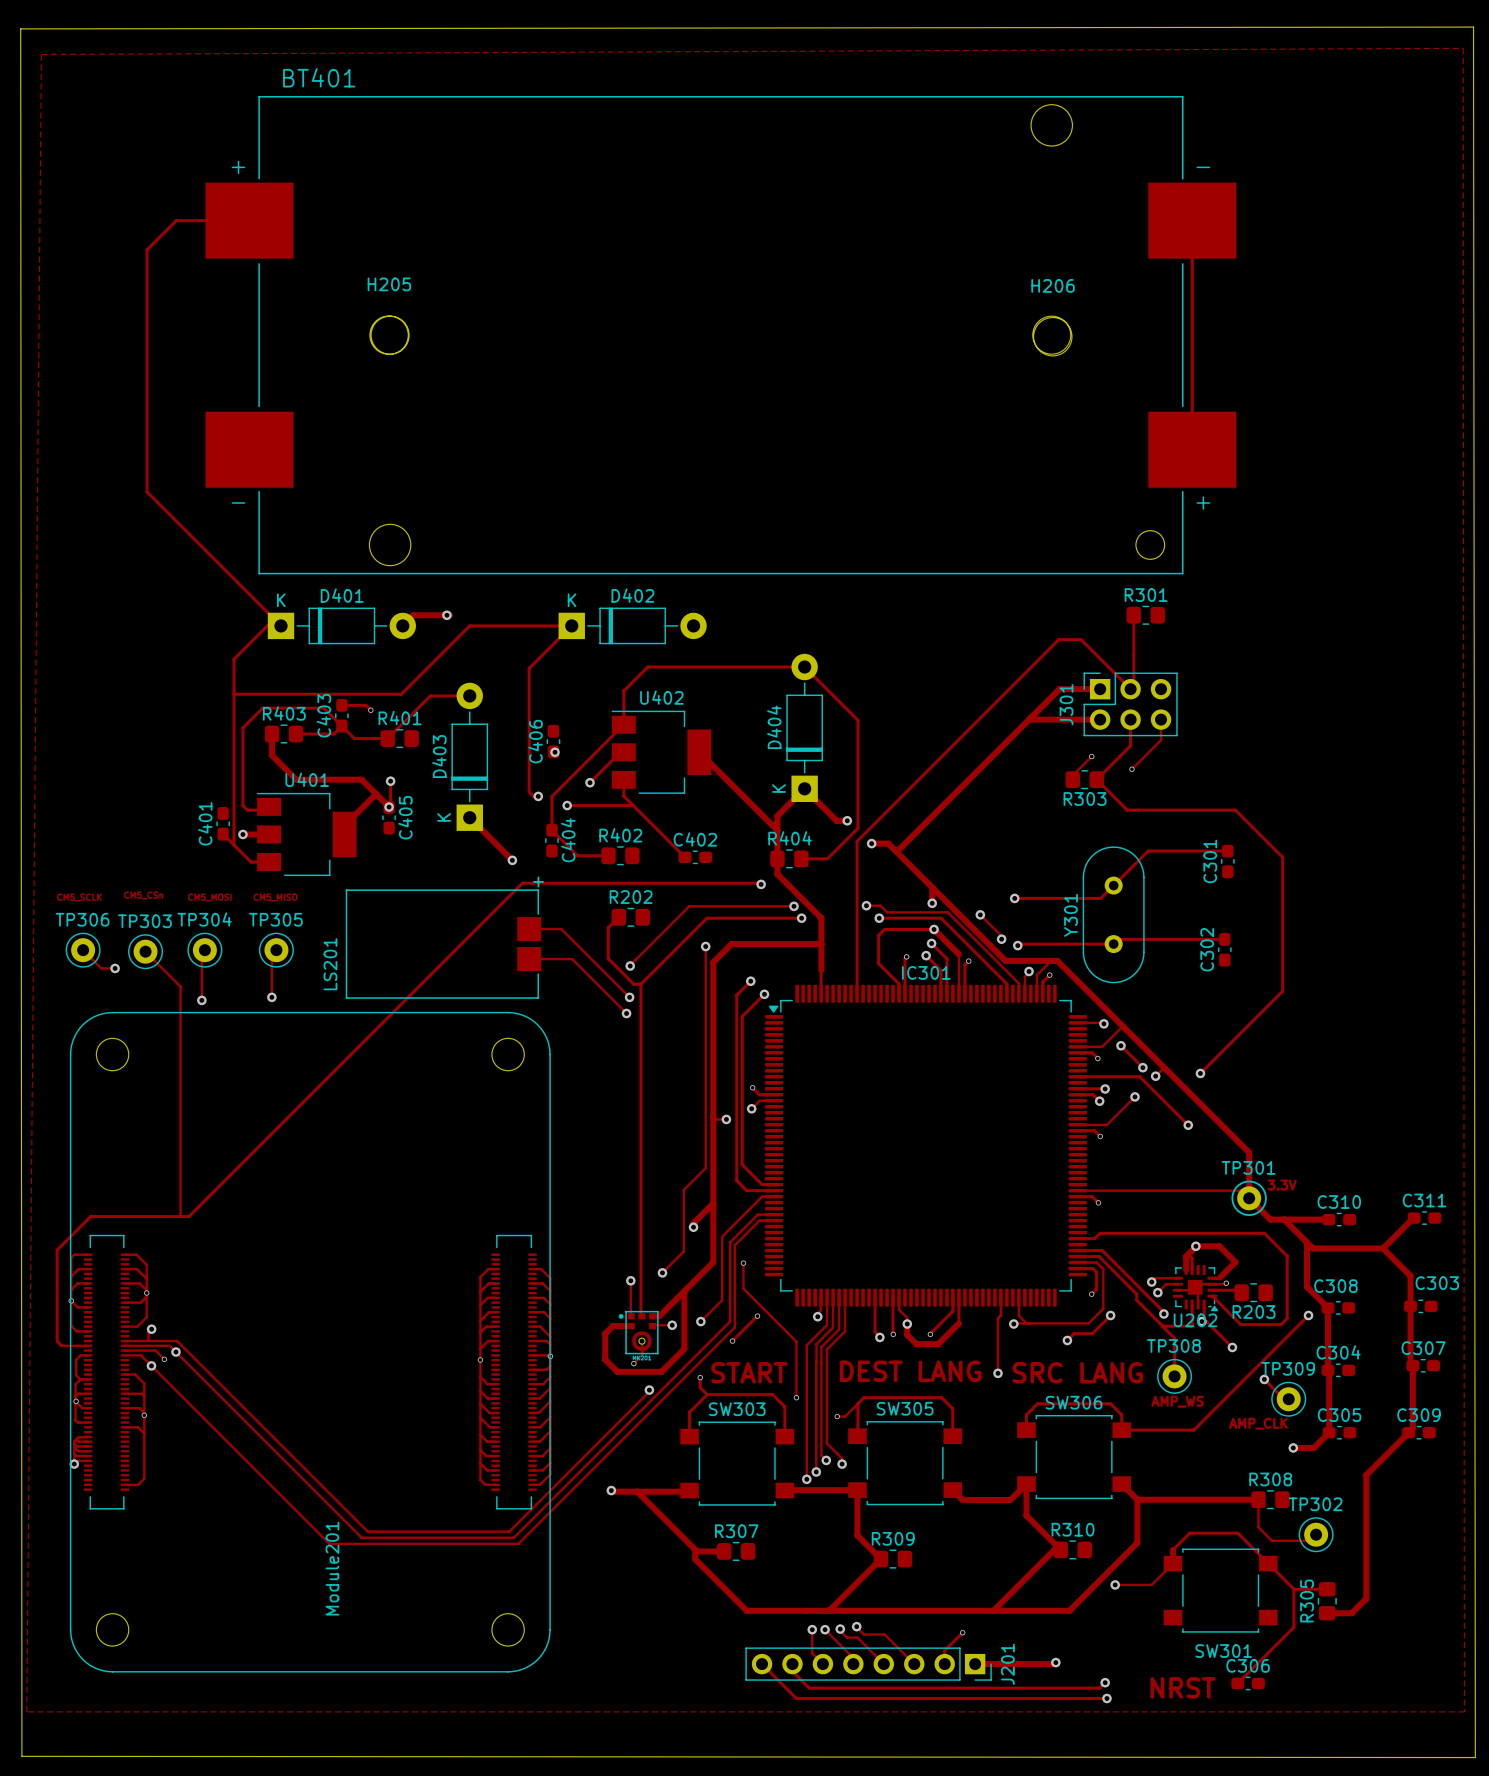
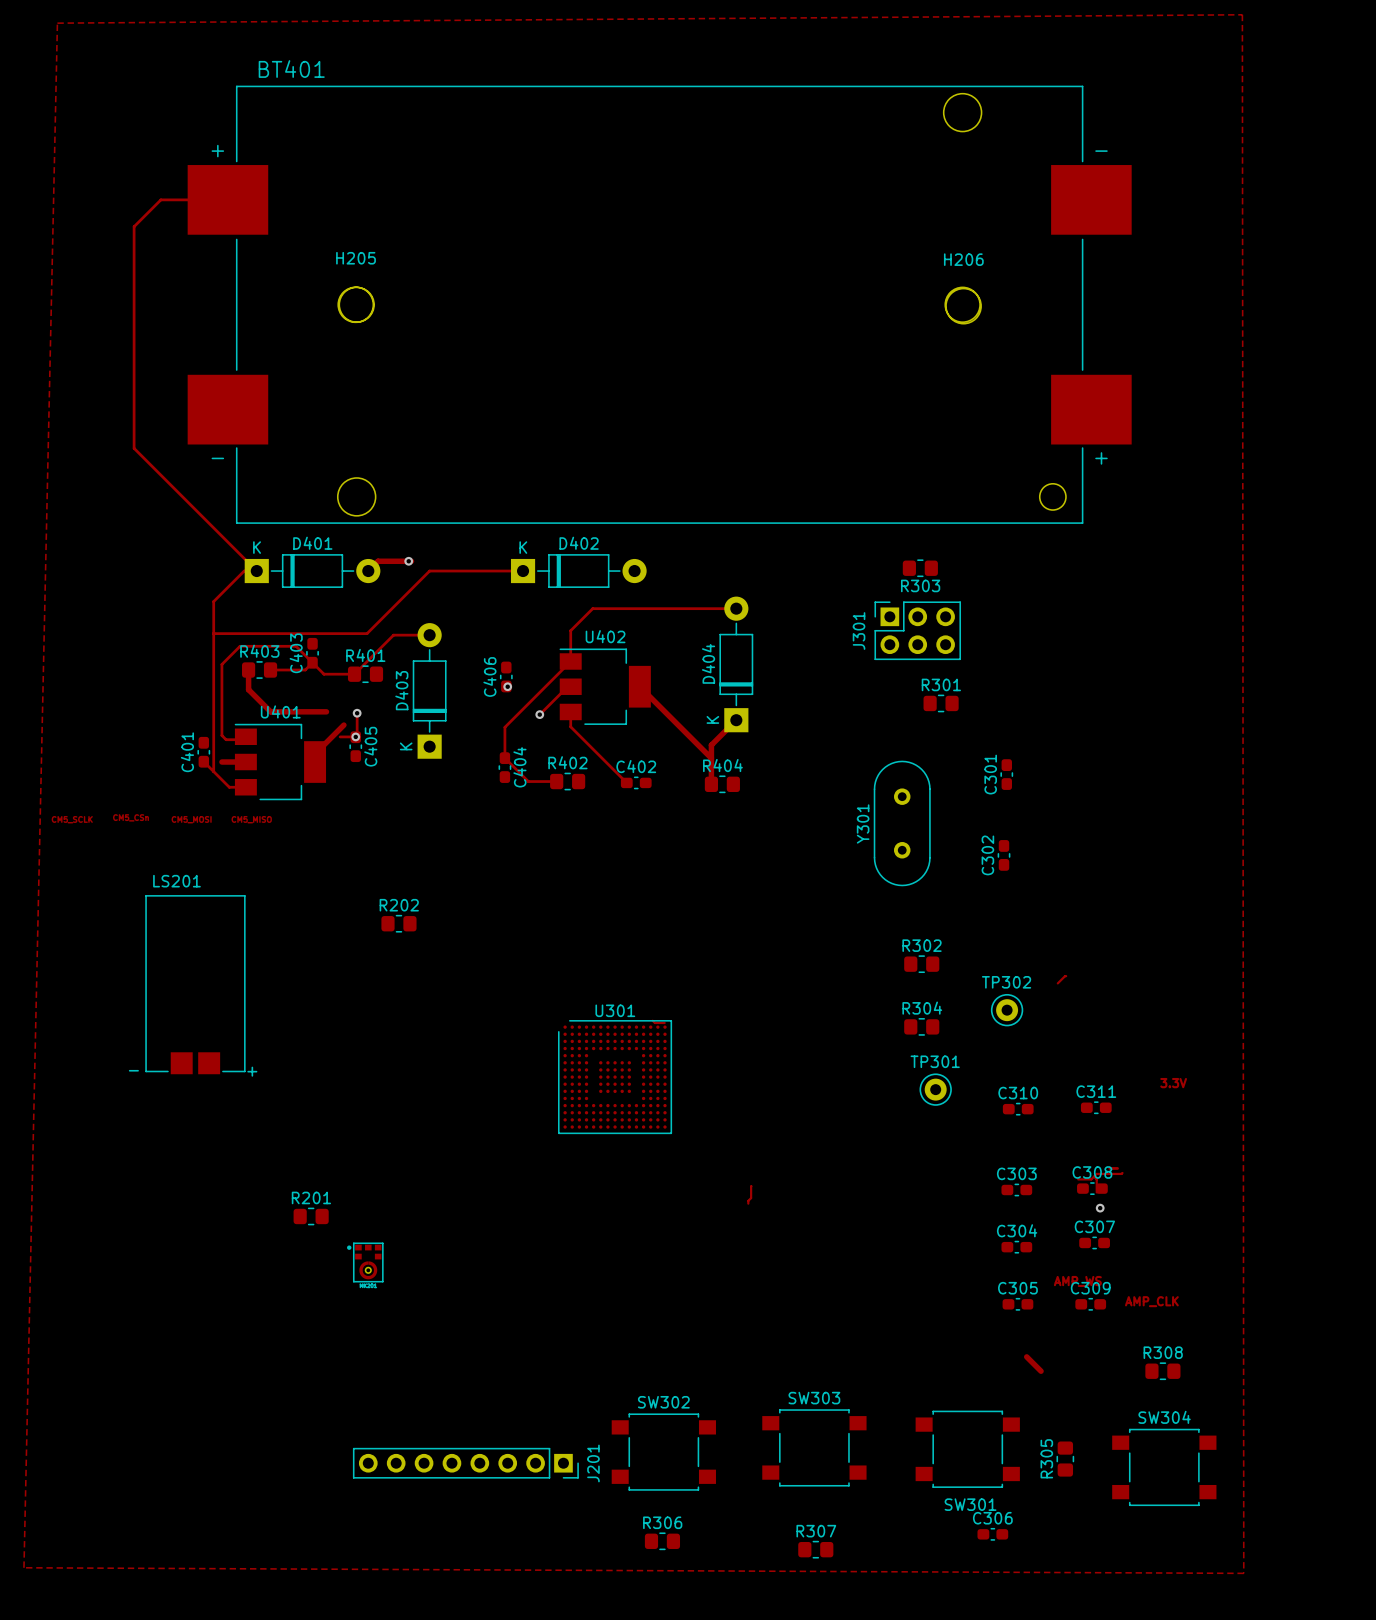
board edge: (1473, 27) (1475, 1757) (21, 1756) (20, 28) (1473, 27) -> none
zone outline: (1463, 48) (41, 54) (26, 1711) (1464, 1711) (1463, 48) -> (1242, 14) (57, 23) (23, 1567) (1243, 1573) (1242, 14)
track: (1192, 220) (1192, 449) -> none
track: (1133, 615) (1133, 685) (1130, 689) (1081, 639) (1058, 639) (857, 841) (857, 993) -> none
R301 position: (1145, 615) -> (941, 703)
track: (571, 625) (529, 668) (529, 791) (533, 796) (538, 796) -> none
track: (804, 667) (857, 720) (857, 828) (827, 858) (801, 858) -> none
track: (1100, 689) (1059, 689) (899, 849) (894, 849) -> none
J301 position: (1130, 704) -> (917, 630)
track: (341, 705) (365, 705) (370, 710) -> none
via: (370, 710) -> none
track: (1029, 719) (1100, 719) -> none
track: (1130, 719) (1130, 745) (1096, 779) (1127, 810) (1235, 810) (1282, 857) (1282, 991) (1200, 1073) -> none
track: (1161, 719) (1161, 740) (1131, 769) -> none
track: (1091, 756) (1072, 775) (1072, 779) -> none
via: (1091, 756) -> none
via: (1131, 769) -> none
track: (357, 779) (361, 779) (389, 807) -> (340, 736) (355, 736)
R303 position: (1084, 779) -> (920, 568)
track: (804, 788) (836, 820) (847, 820) -> none
via: (538, 796) -> none
via: (567, 805) -> none
track: (632, 805) (567, 805) -> none
track: (469, 817) (512, 860) -> none
via: (847, 820) -> none
via: (242, 834) -> none
track: (871, 843) (888, 843) (1005, 960) (1057, 960) (1249, 1152) (1249, 1198) -> none
via: (871, 843) -> none
track: (1227, 851) (1148, 851) (1100, 898) (1014, 898) -> none
track: (777, 858) (777, 874) (821, 918) (821, 993) -> none
via: (512, 860) -> none
C301 position: (1227, 861) -> (1006, 774)
track: (761, 884) (522, 883) (189, 1216) (90, 1216) (57, 1250) (57, 1341) (61, 1345) (88, 1345) -> none
via: (761, 884) -> none
track: (933, 888) (932, 903) -> none
LS201 footprint: [345, 889, 542, 999] -> [145, 895, 246, 1075]
via: (1014, 898) -> none
via: (932, 903) -> none
track: (866, 905) (880, 905) (887, 912) (947, 912) (1018, 983) (1018, 993) -> none
via: (866, 905) -> none
track: (794, 906) (689, 906) (630, 965) -> none
via: (794, 906) -> none
track: (980, 914) (1001, 936) (1001, 939) -> none
via: (980, 914) -> none
Y301 position: (1113, 914) -> (902, 823)
track: (618, 917) (608, 927) (608, 958) (633, 984) (640, 984) -> none
R202 position: (630, 917) -> (398, 923)
track: (801, 918) (706, 918) (640, 984) -> none
via: (801, 918) -> none
track: (879, 918) (941, 918) (1006, 984) (1006, 993) -> none
via: (879, 918) -> none
track: (529, 929) (561, 929) (629, 997) -> none
via: (934, 929) -> none
via: (1001, 939) -> none
track: (1224, 939) (1118, 939) (1113, 944) (1017, 945) -> none
track: (931, 943) (946, 958) (946, 993) -> none
via: (931, 943) -> none
track: (821, 944) (731, 944) (713, 962) (713, 1262) (659, 1316) (651, 1316) -> none
via: (1017, 945) -> none
track: (705, 946) (705, 1168) (683, 1190) (683, 1251) (662, 1272) -> none
via: (705, 946) -> none
C302 position: (1224, 949) -> (1004, 855)
track: (83, 950) (101, 968) (115, 968) -> none
TP306: (83, 950) -> none
track: (204, 950) (201, 953) (201, 1000) -> none
TP304: (204, 950) -> none
track: (276, 950) (271, 954) (271, 997) -> none
TP305: (276, 950) -> none
track: (145, 951) (180, 986) (180, 1216) -> none
TP303: (145, 951) -> none
track: (926, 955) (940, 970) (940, 993) -> none
via: (926, 955) -> none
track: (906, 956) (905, 958) (905, 993) -> none
via: (906, 956) -> none
track: (529, 959) (572, 959) (626, 1013) -> none
track: (1051, 960) (1036, 975) (1036, 993) -> none
track: (968, 961) (964, 964) (964, 993) -> none
via: (968, 961) -> none
LS201 name position: LS201 (330, 964) -> LS201 (176, 881)
via: (630, 965) -> none
via: (115, 968) -> none
track: (1029, 971) (1024, 976) (1024, 993) -> none
via: (1029, 971) -> none
track: (1049, 975) (1042, 982) (1042, 993) -> none
via: (1049, 975) -> none
track: (750, 981) (736, 995) (736, 1180) (746, 1190) (774, 1190) -> none
via: (750, 981) -> none
track: (640, 984) (640, 1316) -> none
track: (899, 993) (899, 983) (878, 963) (878, 935) (884, 929) (934, 929) (958, 954) (958, 993) -> none
track: (764, 994) (742, 1016) (742, 1164) (762, 1184) (774, 1184) -> none
via: (764, 994) -> none
via: (271, 997) -> none
via: (629, 997) -> none
via: (201, 1000) -> none
via: (626, 1013) -> none
track: (1077, 1022) (1102, 1022) -> none
via: (1103, 1023) -> none
track: (1122, 1026) (1102, 1046) (1077, 1046) -> none
track: (1120, 1045) (1142, 1067) -> none
via: (1120, 1045) -> none
track: (1077, 1052) (1092, 1052) (1097, 1058) -> none
R302: none -> (921, 964)
via: (1097, 1058) -> none
via: (1142, 1067) -> none
via: (1200, 1073) -> none
track: (1077, 1076) (1139, 1076) (1188, 1125) -> none
via: (1155, 1076) -> none
track: (752, 1087) (759, 1094) (774, 1094) -> none
via: (752, 1087) -> none
track: (1077, 1088) (1105, 1088) -> none
via: (1105, 1088) -> none
track: (1077, 1094) (1093, 1094) (1099, 1101) -> none
track: (1134, 1096) (1106, 1124) (1078, 1124) -> none
via: (1134, 1096) -> none
track: (774, 1100) (759, 1100) (751, 1108) -> none
via: (1099, 1101) -> none
via: (751, 1108) -> none
via: (726, 1119) -> none
R304: none -> (921, 1026)
via: (1188, 1125) -> none
track: (1077, 1130) (1094, 1130) (1099, 1135) -> none
via: (1100, 1136) -> none
IC301: (925, 1145) -> none
U301: none -> (615, 1077)
track: (1077, 1190) (1241, 1190) (1249, 1198) -> none
track: (774, 1196) (762, 1196) (722, 1236) (722, 1300) (700, 1321) -> none
track: (1077, 1196) (1092, 1196) (1097, 1202) -> none
track: (1249, 1198) (1270, 1219) (1328, 1219) -> none
TP301 position: (1249, 1198) -> (935, 1089)
via: (1098, 1202) -> none
track: (713, 1203) (693, 1223) (693, 1227) -> none
track: (774, 1214) (757, 1214) (730, 1242) (730, 1321) (513, 1537) (361, 1537) (169, 1345) (125, 1345) -> none
track: (1414, 1218) (1383, 1248) -> none
C311 position: (1424, 1218) -> (1096, 1107)
track: (1284, 1219) (1313, 1248) (1383, 1248) -> none
C310 position: (1339, 1219) -> (1018, 1109)
track: (774, 1220) (759, 1220) (734, 1245) (734, 1327) (518, 1543) (329, 1543) (140, 1355) (125, 1355) -> none
via: (693, 1227) -> none
track: (1077, 1238) (1094, 1238) (1099, 1233) (1264, 1233) (1287, 1256) (1287, 1318) (1281, 1324) (1240, 1324) (1212, 1295) -> none
track: (1307, 1242) (1307, 1286) (1329, 1309) -> none
via: (1195, 1246) -> none
track: (1383, 1248) (1410, 1275) (1412, 1428) (1366, 1475) (1366, 1598) (1351, 1613) (1327, 1613) -> none
track: (1077, 1250) (1102, 1250) (1163, 1313) -> none
track: (88, 1254) (74, 1254) (71, 1257) (71, 1325) (76, 1331) (88, 1331) -> none
track: (125, 1254) (136, 1254) (146, 1264) (146, 1317) (137, 1326) (125, 1326) -> none
track: (1188, 1254) (1192, 1258) (1192, 1270) -> none
track: (1077, 1256) (1099, 1256) (1136, 1294) (1136, 1300) (1162, 1326) -> none
track: (1077, 1262) (1096, 1262) (1103, 1269) (1103, 1308) (1088, 1323) (1013, 1324) -> none
track: (743, 1263) (743, 1288) (796, 1341) (796, 1397) -> none
via: (743, 1263) -> none
track: (1077, 1268) (1092, 1268) (1096, 1272) (1096, 1289) (1091, 1294) -> none
track: (88, 1269) (78, 1269) (71, 1276) -> none
track: (125, 1269) (136, 1269) (146, 1278) -> none
track: (495, 1269) (488, 1269) (480, 1277) (480, 1479) (485, 1484) (495, 1484) -> none
track: (532, 1269) (541, 1269) (550, 1278) (550, 1474) (540, 1484) (532, 1484) -> none
track: (1186, 1270) (1186, 1256) (1195, 1246) (1219, 1246) (1235, 1262) (1220, 1277) -> none
via: (662, 1272) -> none
track: (1177, 1278) (1155, 1278) (1151, 1282) -> none
track: (630, 1280) (630, 1316) -> none
via: (630, 1280) -> none
via: (1151, 1282) -> none
track: (88, 1283) (77, 1283) (71, 1289) -> none
track: (125, 1283) (139, 1283) (146, 1290) -> none
track: (495, 1283) (488, 1283) (480, 1291) -> none
track: (532, 1283) (542, 1283) (550, 1291) -> none
via: (1226, 1283) -> none
C303 name position: C303 (1437, 1283) -> C303 (1016, 1173)
track: (1177, 1284) (1166, 1284) (1157, 1292) -> none
C308 name position: C308 (1335, 1286) -> C308 (1092, 1172)
U202: (1195, 1288) -> none
track: (1212, 1290) (1239, 1290) (1241, 1292) -> none
track: (684, 1291) (684, 1348) (661, 1371) (617, 1371) (605, 1359) (605, 1333) (612, 1326) (630, 1326) -> none
via: (146, 1292) -> none
via: (1157, 1292) -> none
R203: (1253, 1292) -> none
via: (1091, 1294) -> none
track: (146, 1296) (140, 1302) (125, 1302) -> none
track: (495, 1297) (487, 1297) (480, 1305) -> none
track: (532, 1297) (543, 1297) (550, 1304) -> none
track: (827, 1297) (827, 1325) (806, 1345) (806, 1479) -> none
track: (833, 1297) (833, 1327) (816, 1344) (816, 1362) -> none
track: (839, 1297) (839, 1329) (821, 1347) (821, 1455) (826, 1460) -> none
track: (845, 1297) (845, 1331) (826, 1349) (826, 1443) (842, 1458) (842, 1464) -> none
track: (875, 1297) (875, 1332) (879, 1337) -> none
track: (893, 1297) (892, 1333) -> none
track: (899, 1297) (899, 1309) (907, 1317) (907, 1334) (916, 1344) (938, 1344) (958, 1323) (958, 1297) -> none
track: (952, 1297) (952, 1311) (929, 1334) -> none
track: (1000, 1297) (1000, 1315) -> none
track: (1018, 1297) (1018, 1315) (1026, 1323) -> none
track: (71, 1300) (77, 1307) (88, 1307) -> none
via: (71, 1300) -> none
track: (1192, 1304) (1191, 1326) (1162, 1326) -> none
track: (1204, 1304) (1204, 1319) (1201, 1321) (1206, 1321) (1232, 1347) -> none
C308 position: (1420, 1306) -> (1092, 1188)
track: (1327, 1307) (1329, 1432) (1313, 1447) (1293, 1447) -> none
C303 position: (1338, 1307) -> (1016, 1189)
track: (495, 1312) (489, 1312) (480, 1320) -> none
track: (532, 1312) (544, 1312) (550, 1318) -> none
via: (1163, 1313) -> none
track: (1001, 1315) (997, 1318) (997, 1373) -> none
track: (1110, 1315) (1092, 1333) (1074, 1333) (1067, 1340) -> none
via: (1110, 1315) -> none
track: (1308, 1315) (1193, 1430) (1121, 1430) (1121, 1414) (1110, 1403) (1037, 1403) (1026, 1414) (1026, 1430) -> none
via: (1308, 1315) -> none
track: (757, 1316) (732, 1341) -> none
via: (757, 1316) -> none
via: (817, 1316) -> none
via: (700, 1321) -> none
via: (907, 1324) -> none
via: (1013, 1324) -> none
track: (672, 1325) (651, 1326) -> none
via: (672, 1325) -> none
track: (495, 1326) (486, 1326) (480, 1332) -> none
track: (532, 1326) (540, 1326) (550, 1336) -> none
track: (1162, 1326) (1174, 1338) (1174, 1376) -> none
track: (151, 1329) (148, 1332) (148, 1341) -> none
via: (151, 1329) -> none
R201: none -> (311, 1216)
part position: (638, 1332) -> (365, 1262)
via: (893, 1334) -> none
via: (930, 1334) -> none
via: (879, 1337) -> none
track: (642, 1340) (642, 1355) (633, 1363) -> none
via: (1067, 1340) -> none
track: (125, 1341) (177, 1341) (367, 1531) (509, 1531) (649, 1390) -> none
track: (495, 1341) (488, 1341) (480, 1348) -> none
track: (532, 1341) (546, 1341) (550, 1344) -> none
via: (732, 1341) -> none
Module201: (310, 1342) -> none
via: (1232, 1347) -> none
track: (125, 1350) (155, 1350) (164, 1359) -> none
via: (175, 1352) -> none
track: (88, 1355) (80, 1355) (76, 1359) (76, 1375) (80, 1379) (88, 1379) -> none
track: (532, 1355) (547, 1355) (550, 1358) -> none
via: (550, 1356) -> none
via: (164, 1359) -> none
via: (480, 1359) -> none
track: (816, 1362) (816, 1471) -> none
via: (633, 1363) -> none
via: (151, 1365) -> none
C307 position: (1423, 1365) -> (1094, 1242)
track: (550, 1366) (546, 1369) (532, 1369) -> none
C304 position: (1338, 1370) -> (1016, 1247)
text: DEST LANG (910, 1371) -> none
text: START (749, 1372) -> none
text: SRC LANG (1077, 1372) -> none
via: (997, 1373) -> none
track: (125, 1374) (135, 1374) (144, 1383) (144, 1478) (138, 1484) (125, 1484) -> none
TP308: (1174, 1376) -> none
track: (480, 1377) (487, 1384) (495, 1384) -> none
track: (550, 1377) (543, 1384) (532, 1384) -> none
track: (700, 1377) (700, 1387) (707, 1394) -> none
via: (700, 1377) -> none
track: (80, 1379) (75, 1384) (75, 1420) (77, 1422) (88, 1422) -> none
track: (1264, 1379) (1284, 1399) (1288, 1399) -> none
via: (1264, 1379) -> none
track: (550, 1387) (539, 1398) (532, 1398) -> none
via: (649, 1390) -> none
track: (480, 1391) (487, 1398) (495, 1398) -> none
track: (88, 1393) (78, 1393) (75, 1396) -> none
track: (125, 1393) (141, 1393) (144, 1396) -> none
track: (707, 1394) (772, 1394) (784, 1406) (784, 1436) -> none
track: (707, 1394) (689, 1412) (689, 1436) -> none
via: (796, 1397) -> none
TP309: (1288, 1399) -> none
track: (75, 1401) (82, 1408) (88, 1408) -> none
via: (76, 1401) -> none
track: (550, 1401) (538, 1412) (532, 1412) -> none
track: (859, 1402) (845, 1416) (837, 1416) -> none
track: (480, 1403) (489, 1412) (495, 1412) -> none
track: (125, 1408) (139, 1408) (144, 1412) -> none
via: (144, 1415) -> none
via: (837, 1416) -> none
track: (480, 1417) (489, 1427) (495, 1427) -> none
track: (550, 1417) (540, 1427) (532, 1427) -> none
track: (125, 1427) (137, 1427) (144, 1433) -> none
track: (550, 1431) (539, 1441) (532, 1441) -> none
C305 position: (1339, 1432) -> (1017, 1304)
C309 position: (1419, 1432) -> (1090, 1304)
track: (480, 1434) (487, 1441) (495, 1441) -> none
track: (88, 1436) (78, 1437) (74, 1441) (74, 1464) (77, 1460) (88, 1460) -> none
track: (857, 1436) (857, 1403) (864, 1397) (941, 1397) (952, 1408) (952, 1436) -> none
track: (76, 1439) (78, 1441) (88, 1441) -> none
track: (74, 1443) (77, 1446) (88, 1446) -> none
track: (74, 1447) (78, 1451) (88, 1451) -> none
via: (1293, 1447) -> none
track: (550, 1448) (542, 1456) (532, 1456) -> none
track: (480, 1450) (486, 1456) (495, 1456) -> none
track: (74, 1453) (76, 1456) (88, 1456) -> none
SW306: (1074, 1457) -> none
via: (826, 1460) -> none
track: (550, 1462) (542, 1470) (532, 1470) -> none
track: (480, 1463) (487, 1470) (495, 1470) -> none
SW303 position: (737, 1463) -> (814, 1447)
SW305: (905, 1463) -> none
via: (74, 1464) -> none
via: (842, 1464) -> none
via: (816, 1471) -> none
via: (806, 1479) -> none
track: (611, 1490) (683, 1491) -> none
via: (611, 1490) -> none
track: (784, 1490) (857, 1490) (857, 1535) (880, 1559) (829, 1610) -> none
track: (952, 1490) (962, 1499) (1010, 1499) (1026, 1484) (1026, 1515) (1060, 1549) (1054, 1549) (993, 1610) -> none
track: (637, 1491) (697, 1551) (724, 1551) -> none
track: (1258, 1499) (1258, 1527) (1271, 1540) (1310, 1540) (1316, 1534) -> none
track: (1258, 1499) (1137, 1499) (1137, 1542) (1069, 1610) (746, 1610) (695, 1559) (695, 1549) -> none
TP302 footprint: [1298, 1517, 1334, 1553] -> [990, 993, 1024, 1027]
R310: (1072, 1549) -> none
R307 position: (736, 1551) -> (815, 1549)
R309: (892, 1559) -> none
track: (1115, 1584) (1151, 1584) (1173, 1563) (1173, 1549) (1189, 1533) (1237, 1533) (1293, 1589) -> none
via: (1115, 1584) -> none
SW302: none -> (663, 1452)
track: (1293, 1589) (1293, 1627) (1237, 1683) -> none
track: (1293, 1589) (1327, 1589) -> none
SW301 position: (1220, 1590) -> (967, 1449)
R305 position: (1327, 1601) -> (1065, 1459)
SW304: none -> (1164, 1467)
track: (856, 1626) (864, 1634) (884, 1634) (914, 1664) -> none
via: (856, 1626) -> none
track: (812, 1629) (812, 1653) (822, 1664) -> none
via: (812, 1629) -> none
track: (825, 1629) (853, 1658) (853, 1664) -> none
via: (825, 1629) -> none
track: (840, 1629) (846, 1637) (857, 1637) (883, 1664) -> none
via: (840, 1629) -> none
track: (962, 1632) (944, 1650) (944, 1664) -> none
via: (962, 1632) -> none
track: (1055, 1662) (975, 1664) -> none
via: (1055, 1662) -> none
track: (762, 1664) (796, 1698) (1106, 1698) -> none
track: (792, 1664) (792, 1671) (809, 1688) (1099, 1688) (1105, 1682) -> none
J201 position: (868, 1664) -> (465, 1463)
via: (1105, 1682) -> none
C306 position: (1248, 1683) -> (992, 1534)
R306: none -> (662, 1541)
text: NRST (1183, 1687) -> none
via: (1106, 1698) -> none

